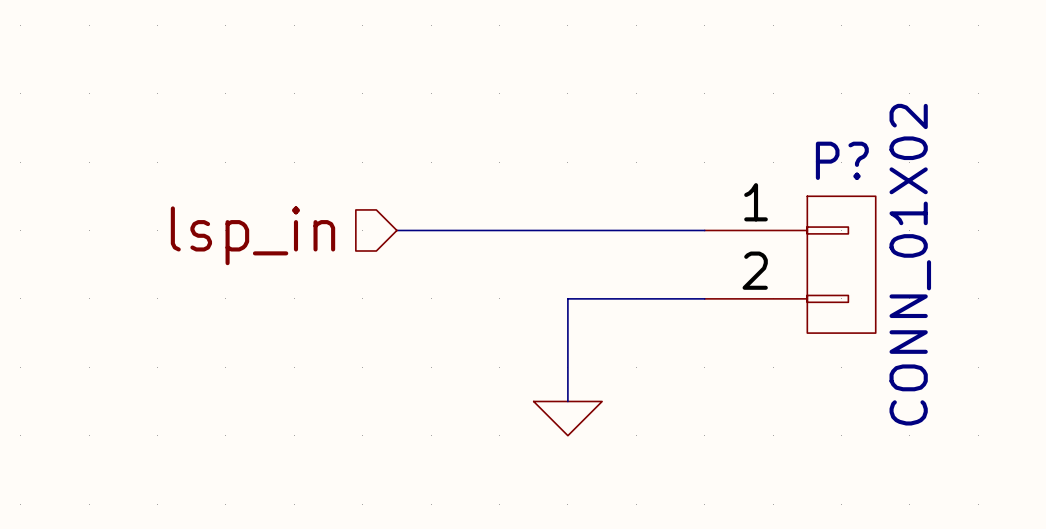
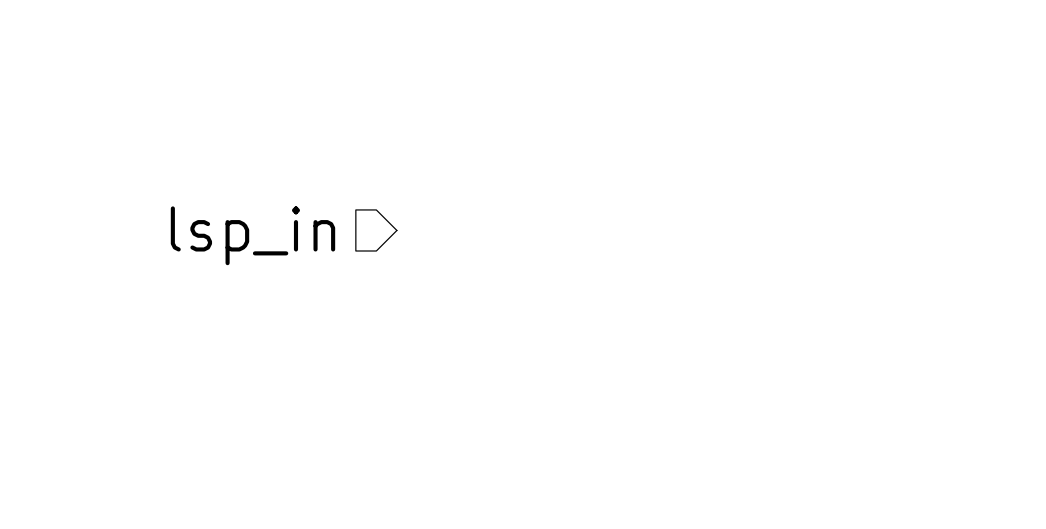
wire: (396, 230) (704, 230) -> none
P?: CONN_01X02 (790, 264) -> none
wire: (704, 298) (567, 298) (567, 401) -> none
power symbol: (567, 418) -> none

